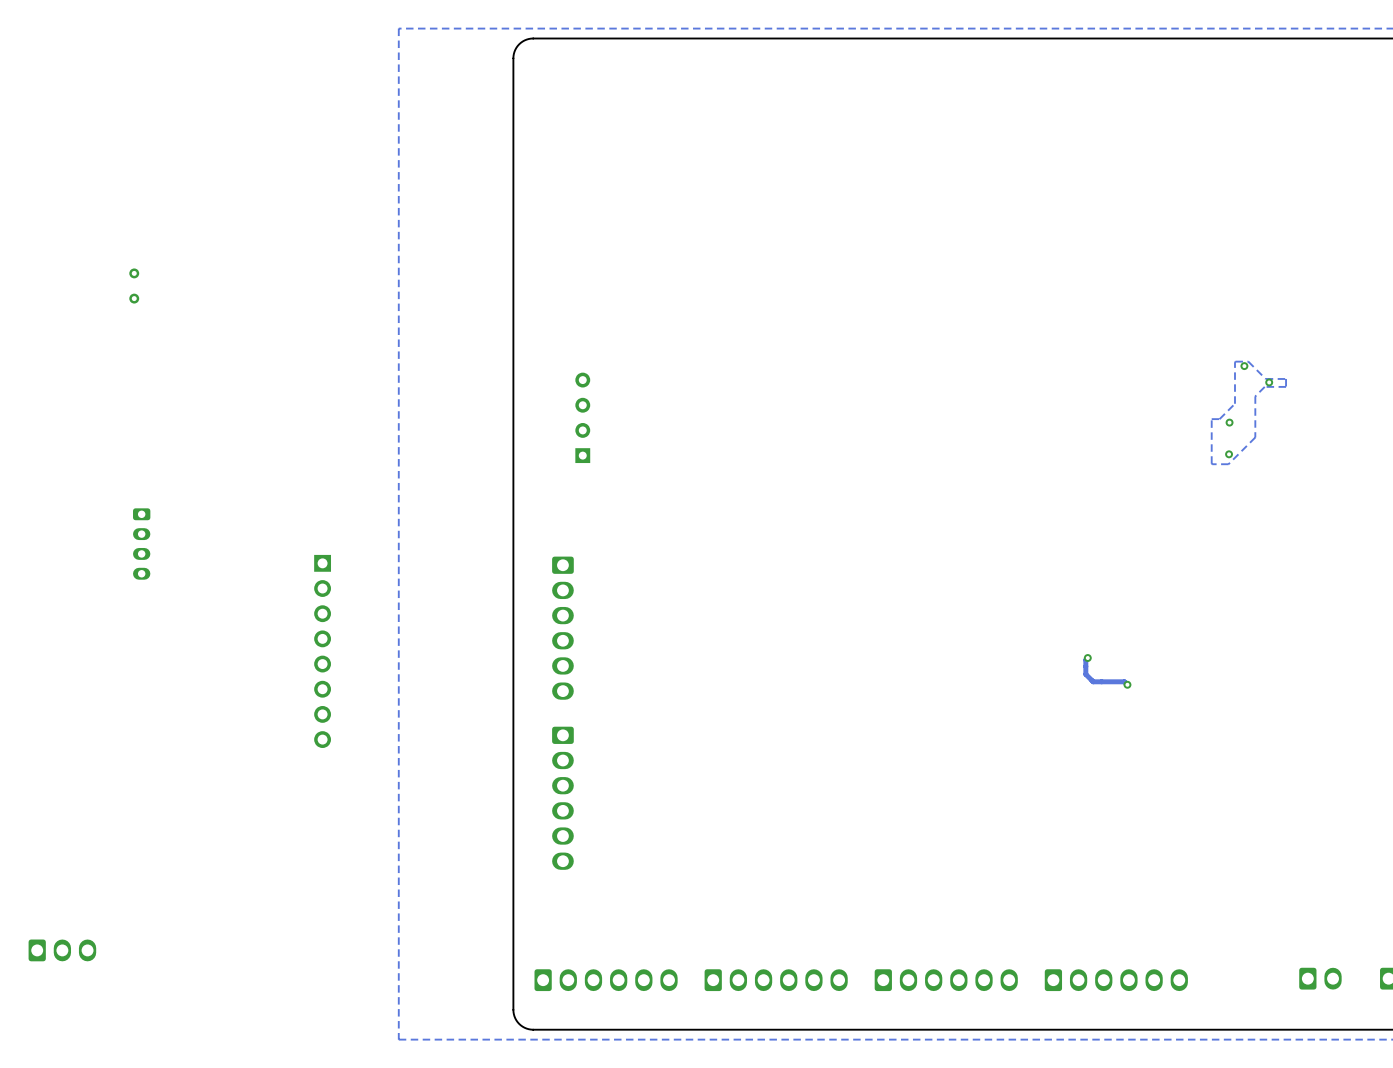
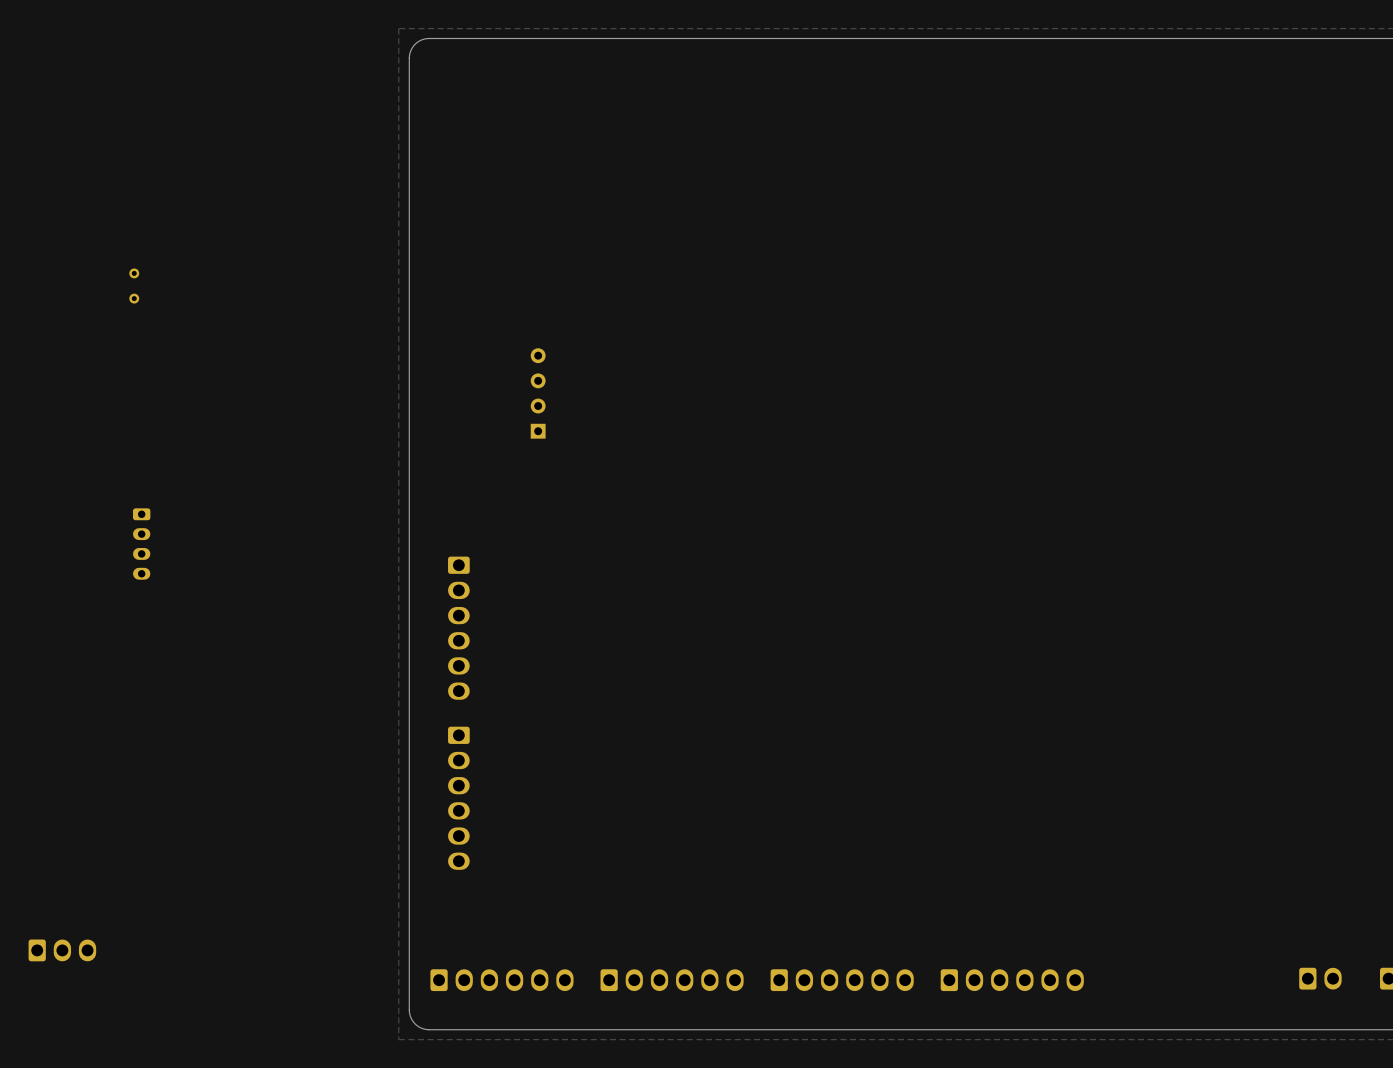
board edge: (533, 38) (519, 44) (513, 58) (513, 1009) (519, 1023) (533, 1029) -> (533, 38) (426, 38) (415, 44) (409, 58) (409, 1012) (415, 1023) (426, 1029) (533, 1029)
zone outline: (1248, 361) (1235, 362) (1235, 403) (1219, 419) (1211, 419) (1212, 464) (1228, 464) (1255, 437) (1255, 396) (1264, 386) (1286, 386) (1286, 378) (1265, 378) (1248, 361) -> none
via: (1244, 366) -> none
via: (1269, 382) -> none
part position: (582, 417) -> (538, 393)
via: (1229, 422) -> none
via: (1229, 454) -> none
part: none -> (458, 628)
part: (562, 628) -> none
part: (322, 651) -> none
track: (1087, 658) (1085, 659) (1085, 674) (1093, 681) (1124, 681) (1127, 684) -> none
via: (1087, 658) -> none
via: (1127, 684) -> none
part: none -> (458, 798)
part: (562, 798) -> none
part: none -> (501, 980)
part: (606, 980) -> none
part: none -> (672, 980)
part: (776, 980) -> none
part: none -> (842, 980)
part: (946, 980) -> none
part: none -> (1012, 980)
part: (1116, 980) -> none

